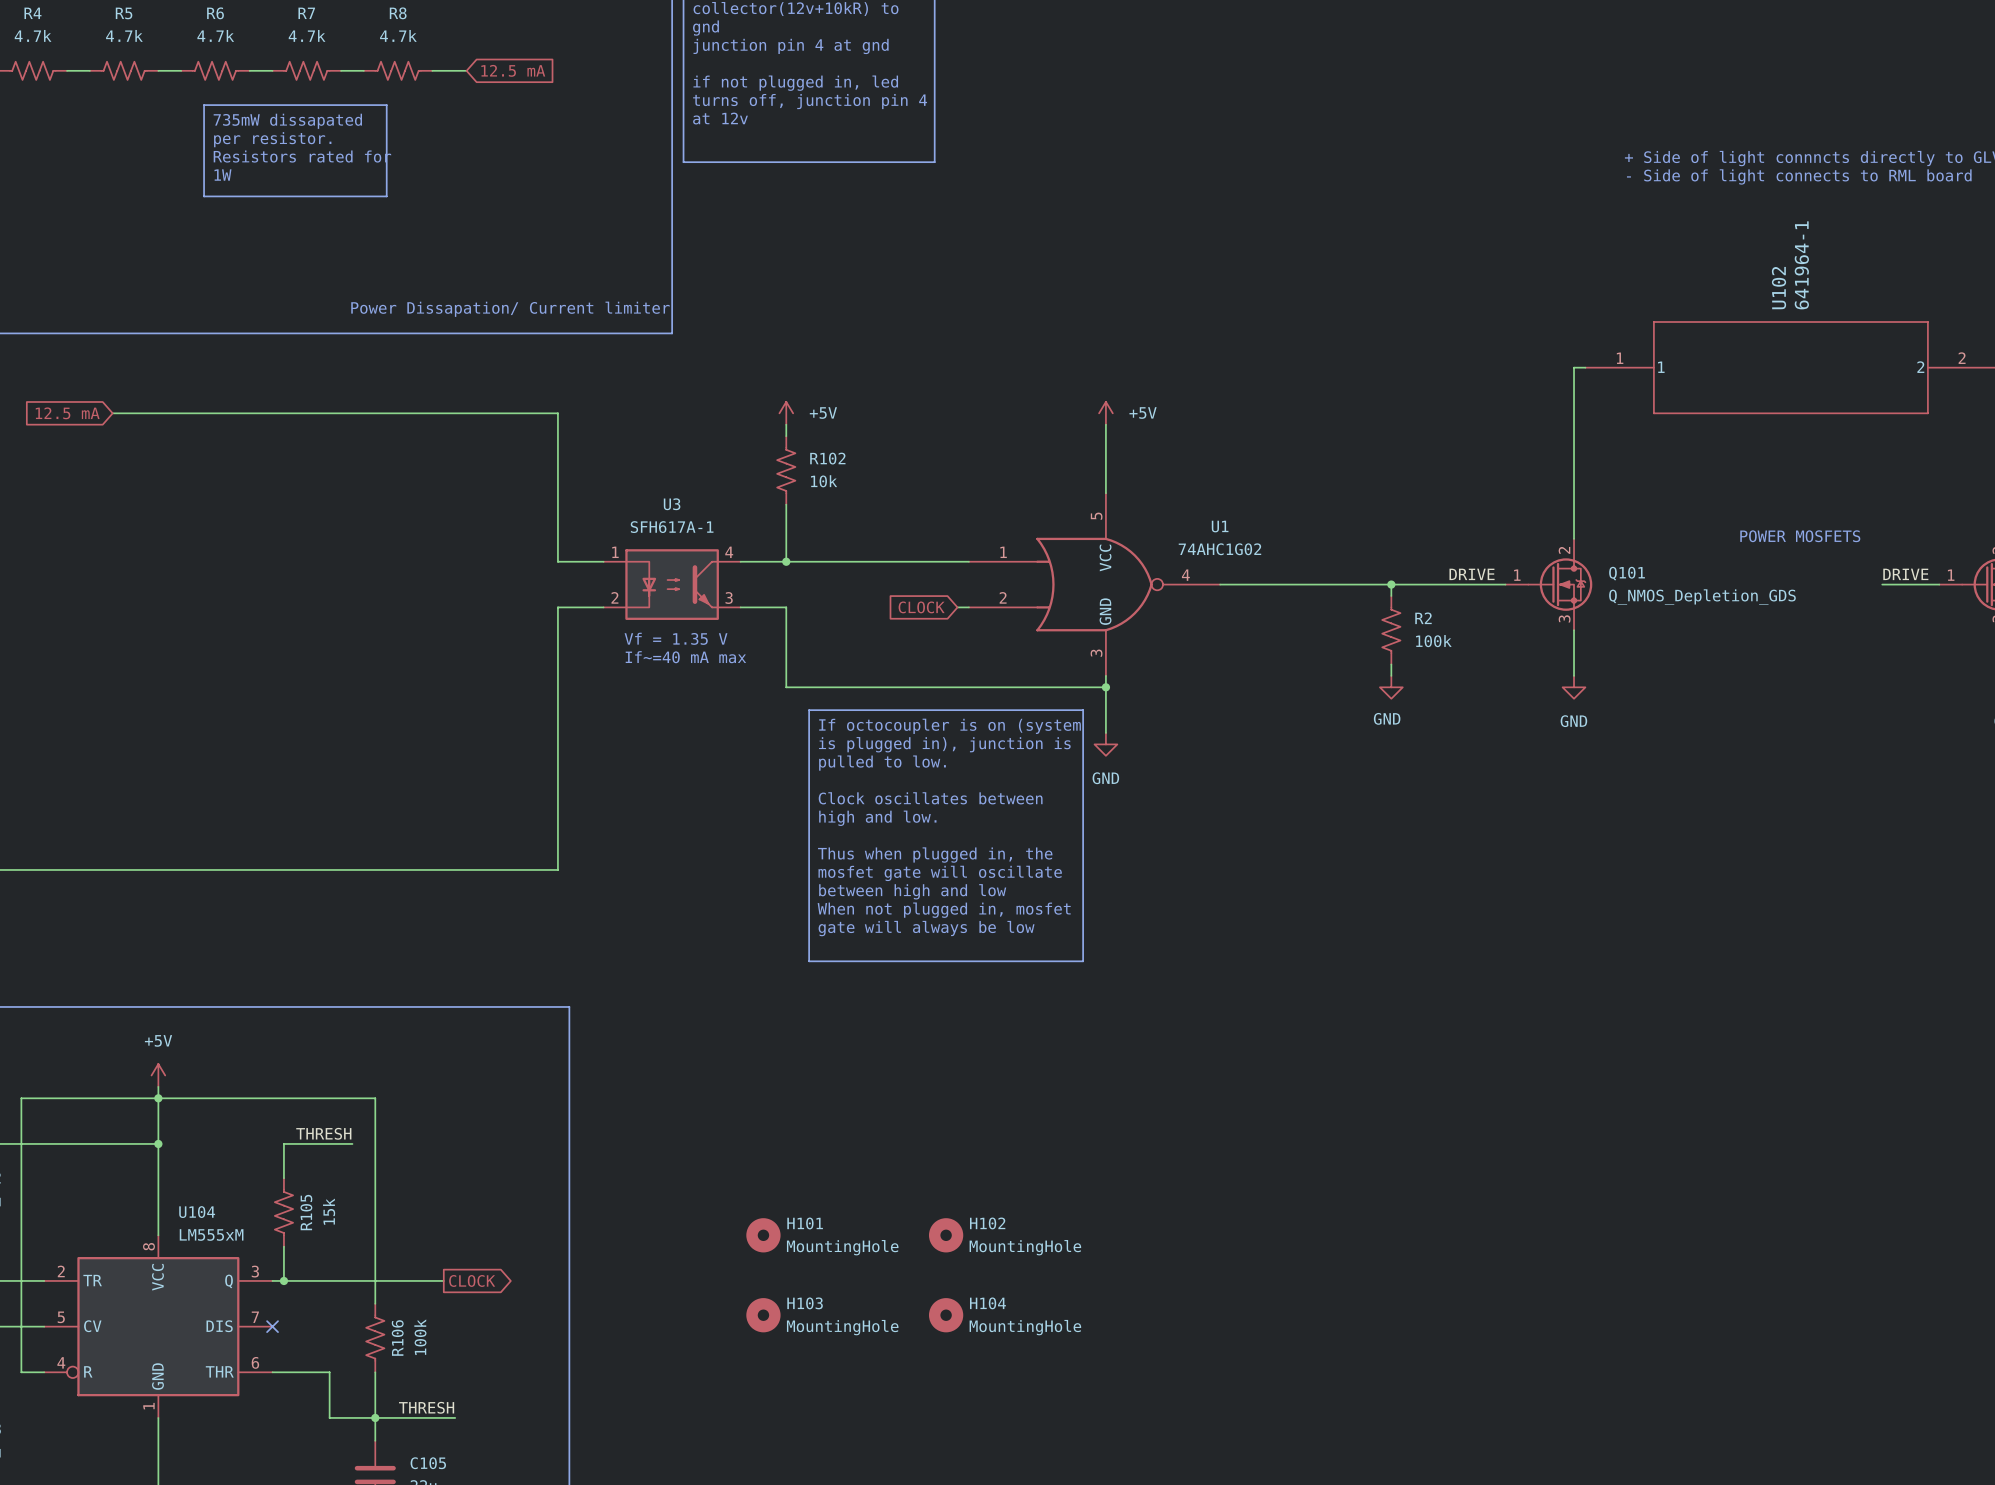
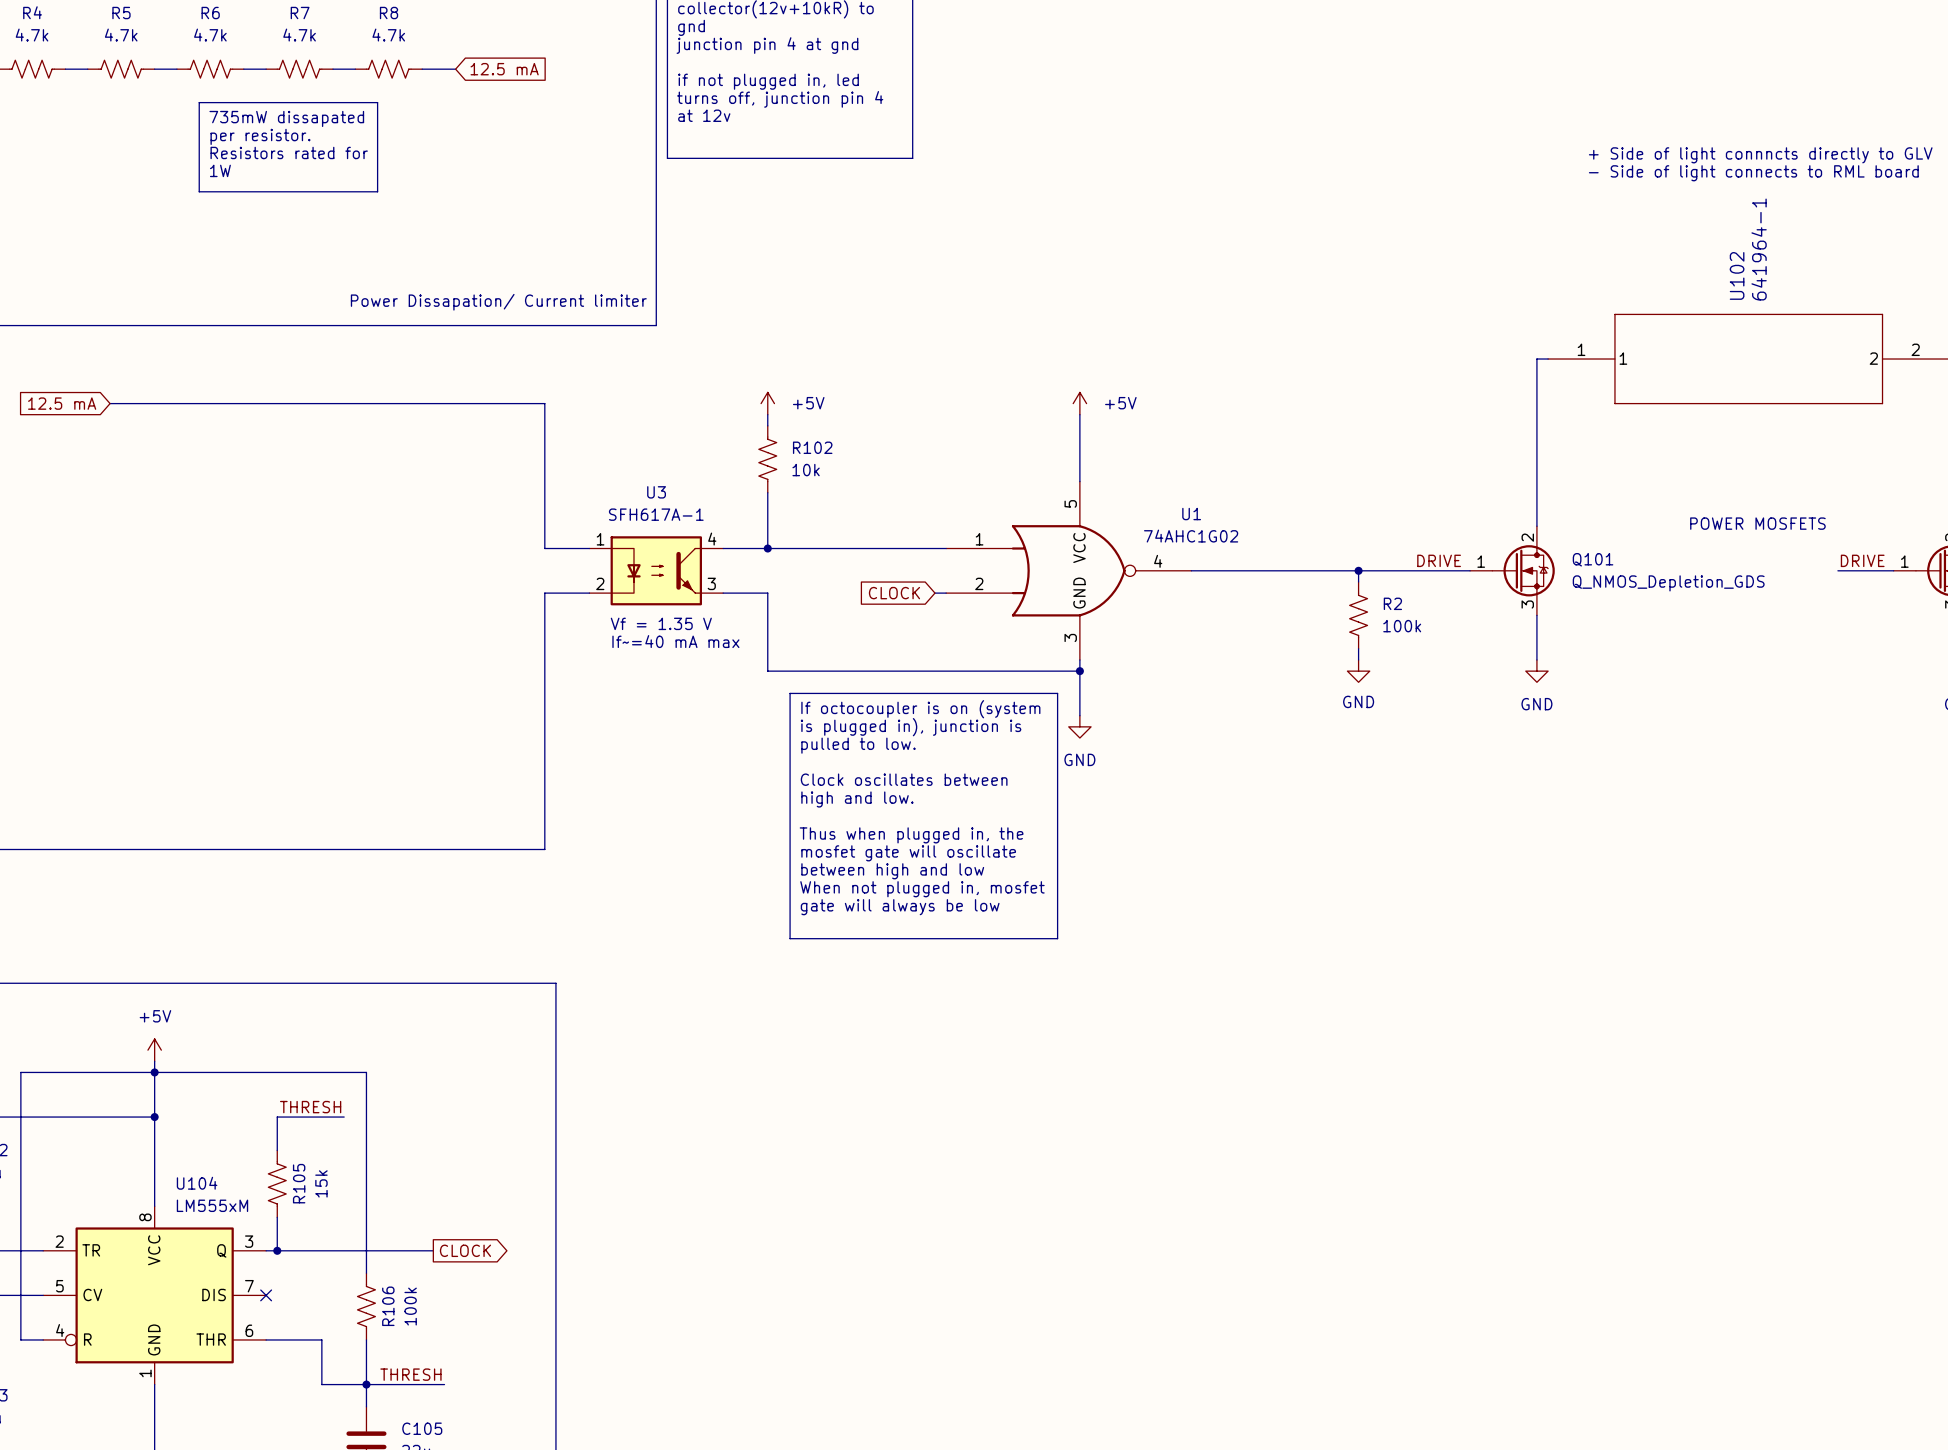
H101: MountingHole (763, 1235) -> none
H102: MountingHole (946, 1235) -> none
H103: MountingHole (763, 1315) -> none
H104: MountingHole (946, 1315) -> none

